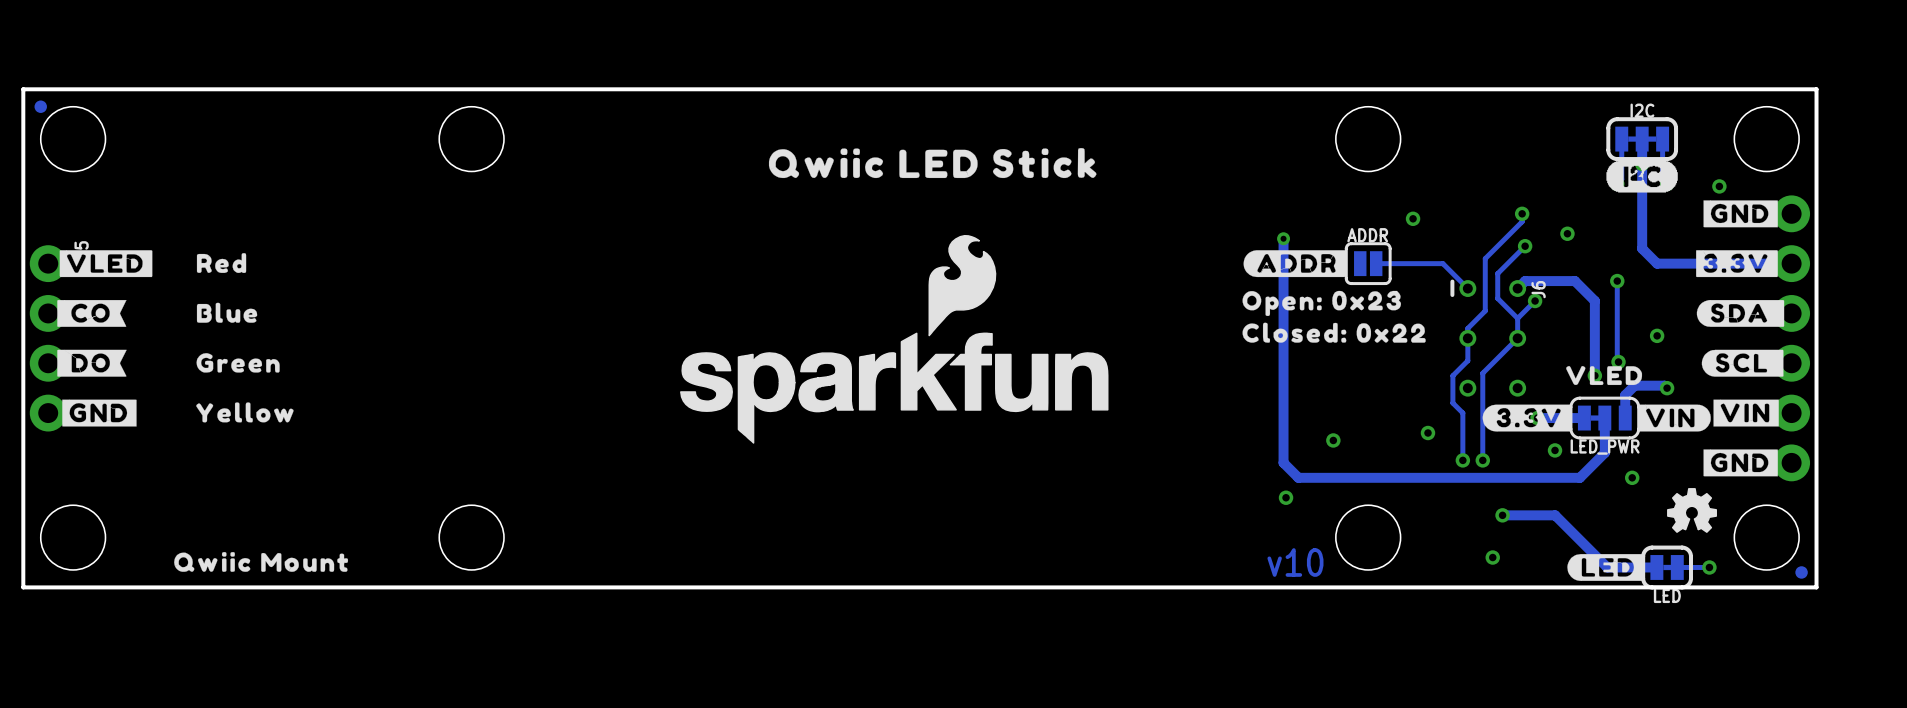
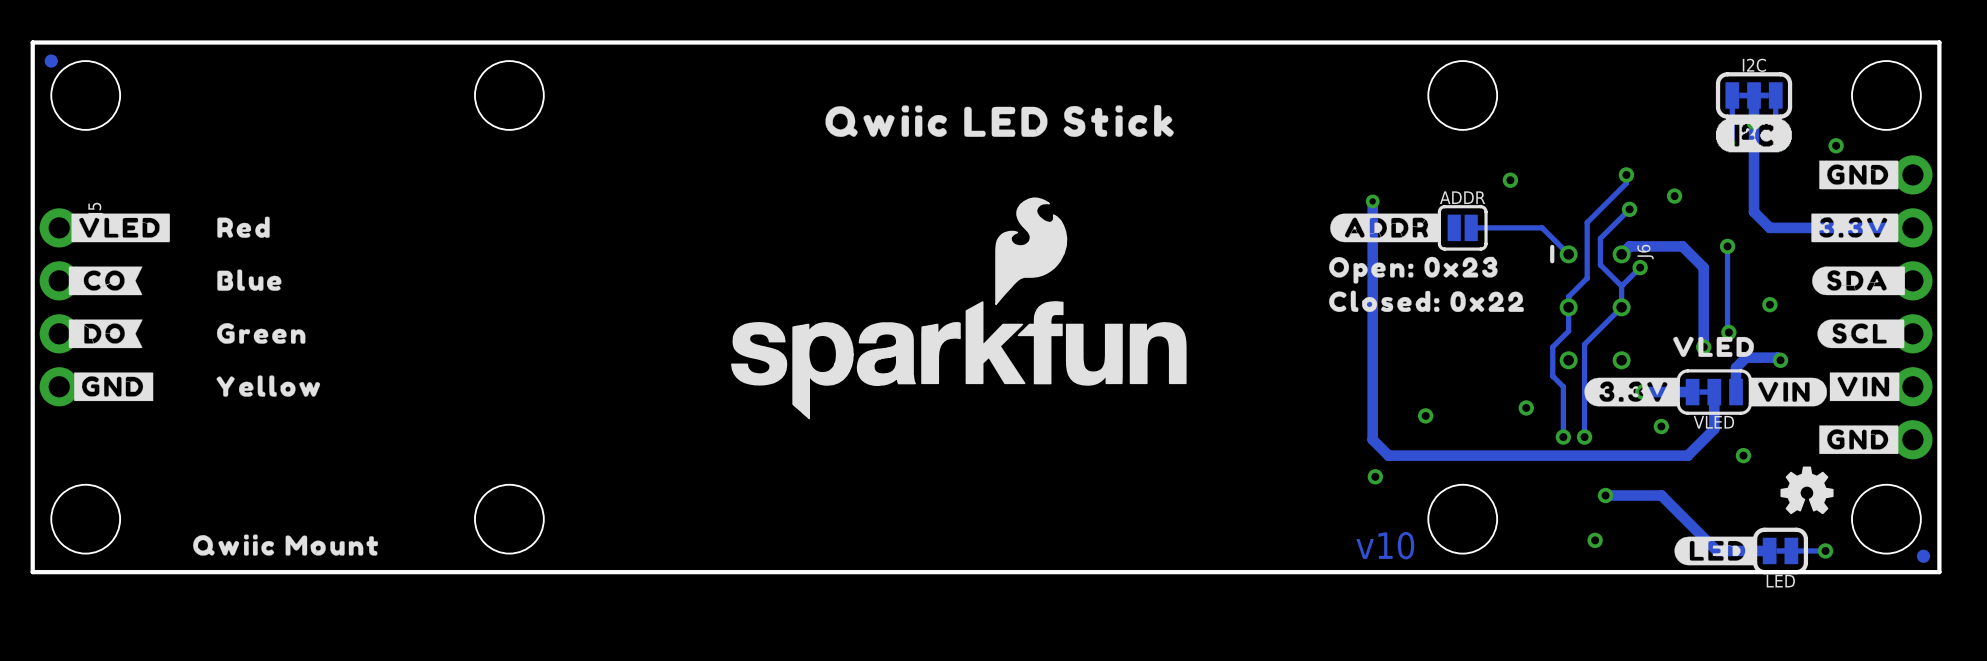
LED_PWR name: LED_PWR (1605, 447) -> VLED (1713, 422)

